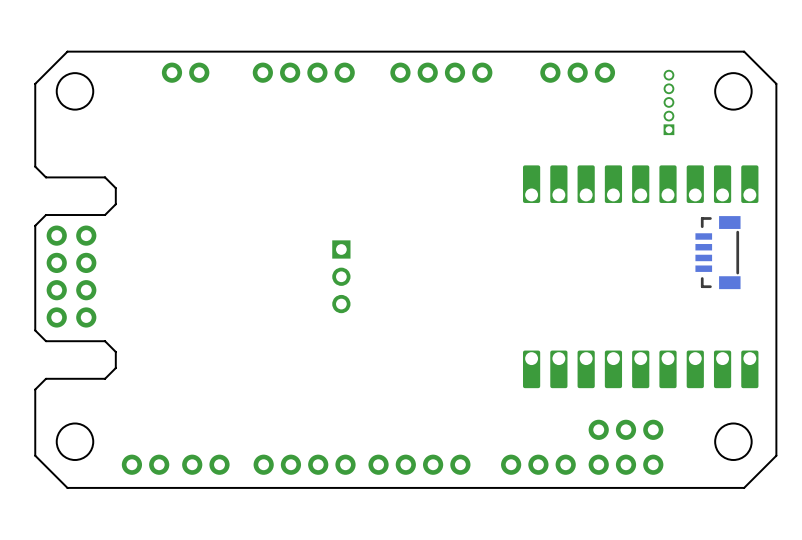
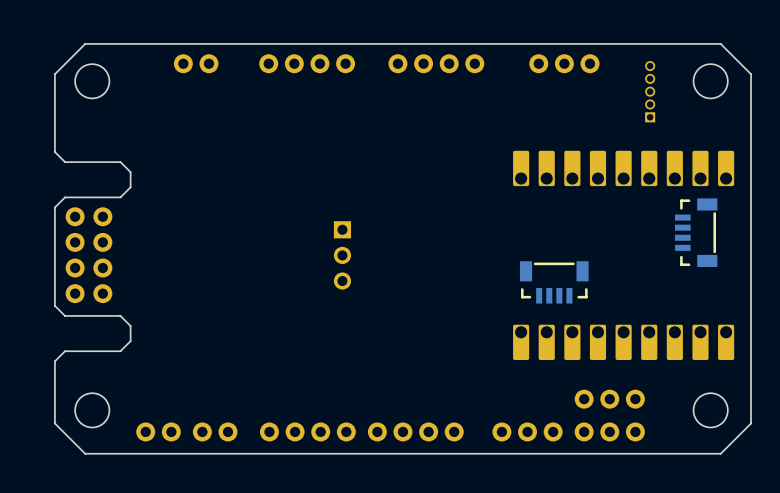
part: none -> (554, 282)

